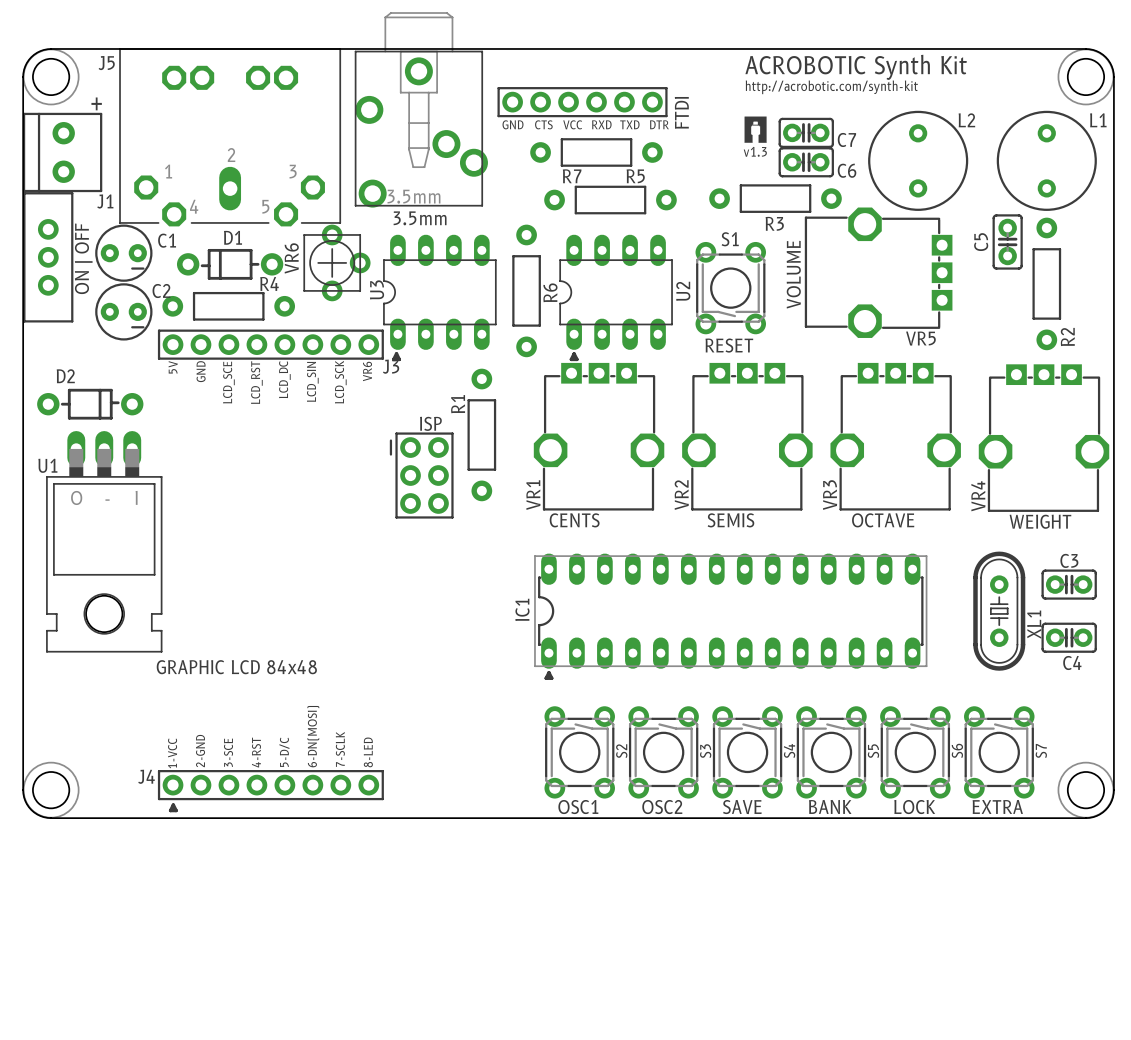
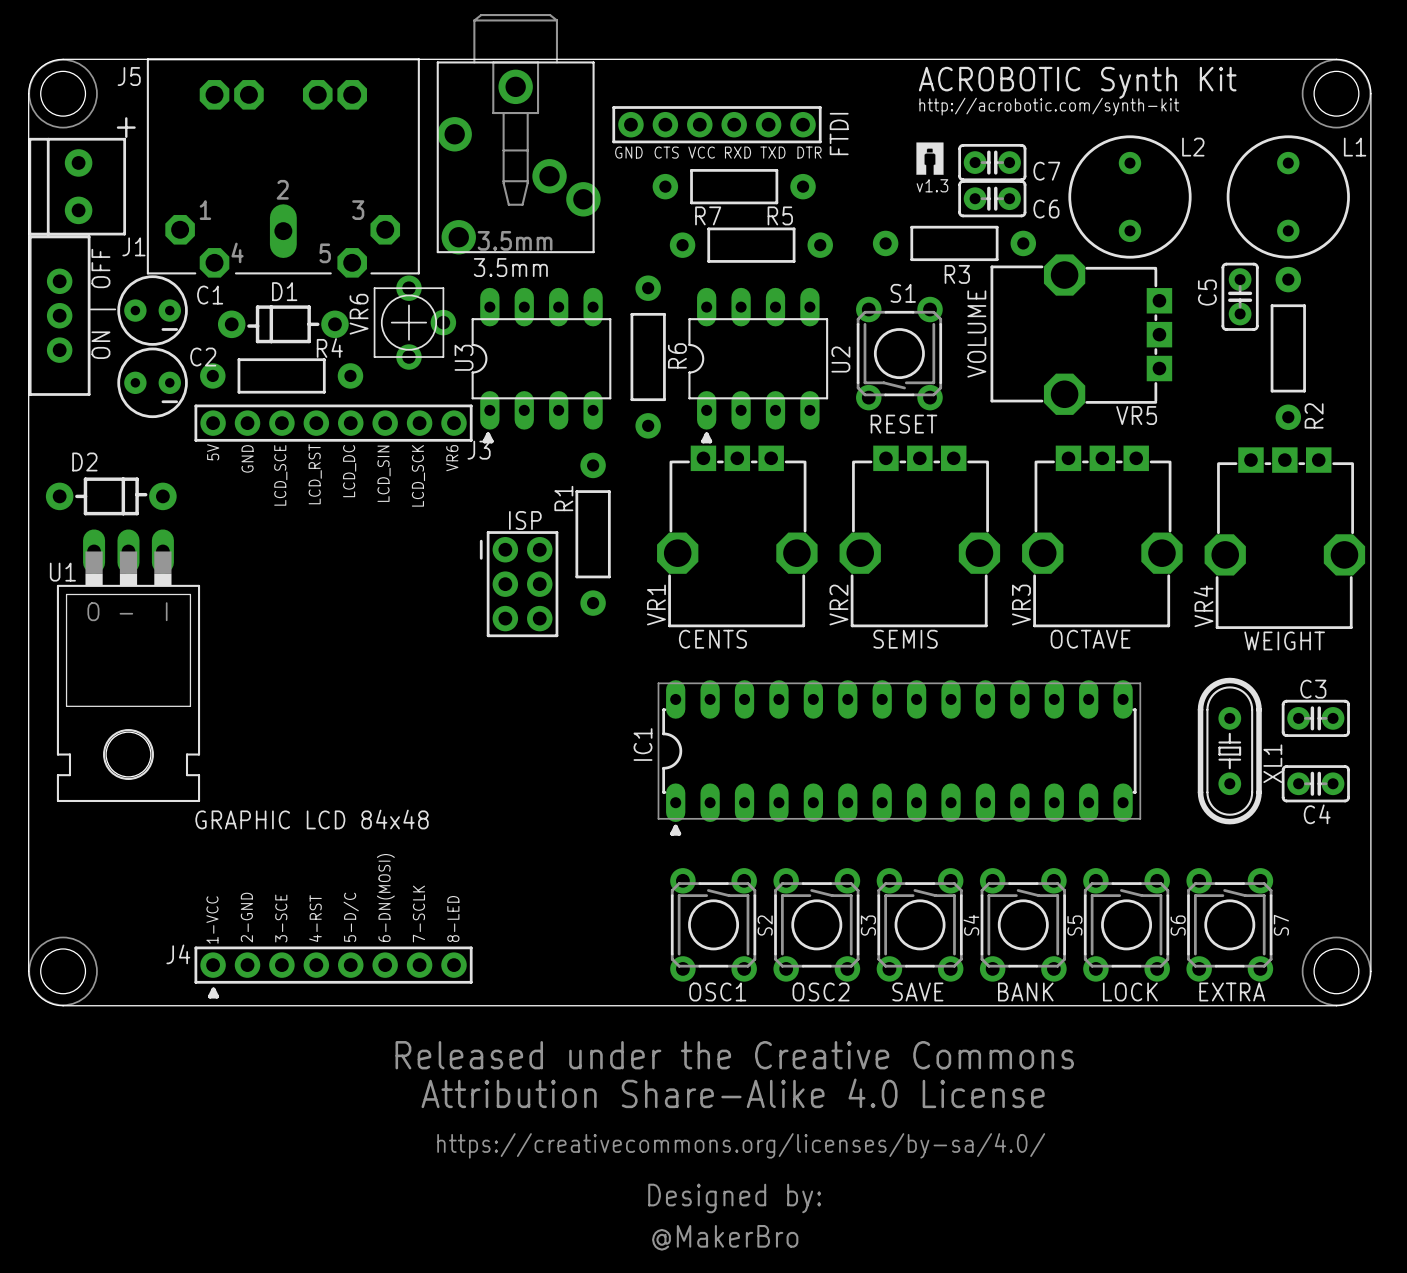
drawing: none -> [395, 1041, 1074, 1214]
text: none -> @MakerBro (725, 1237)

